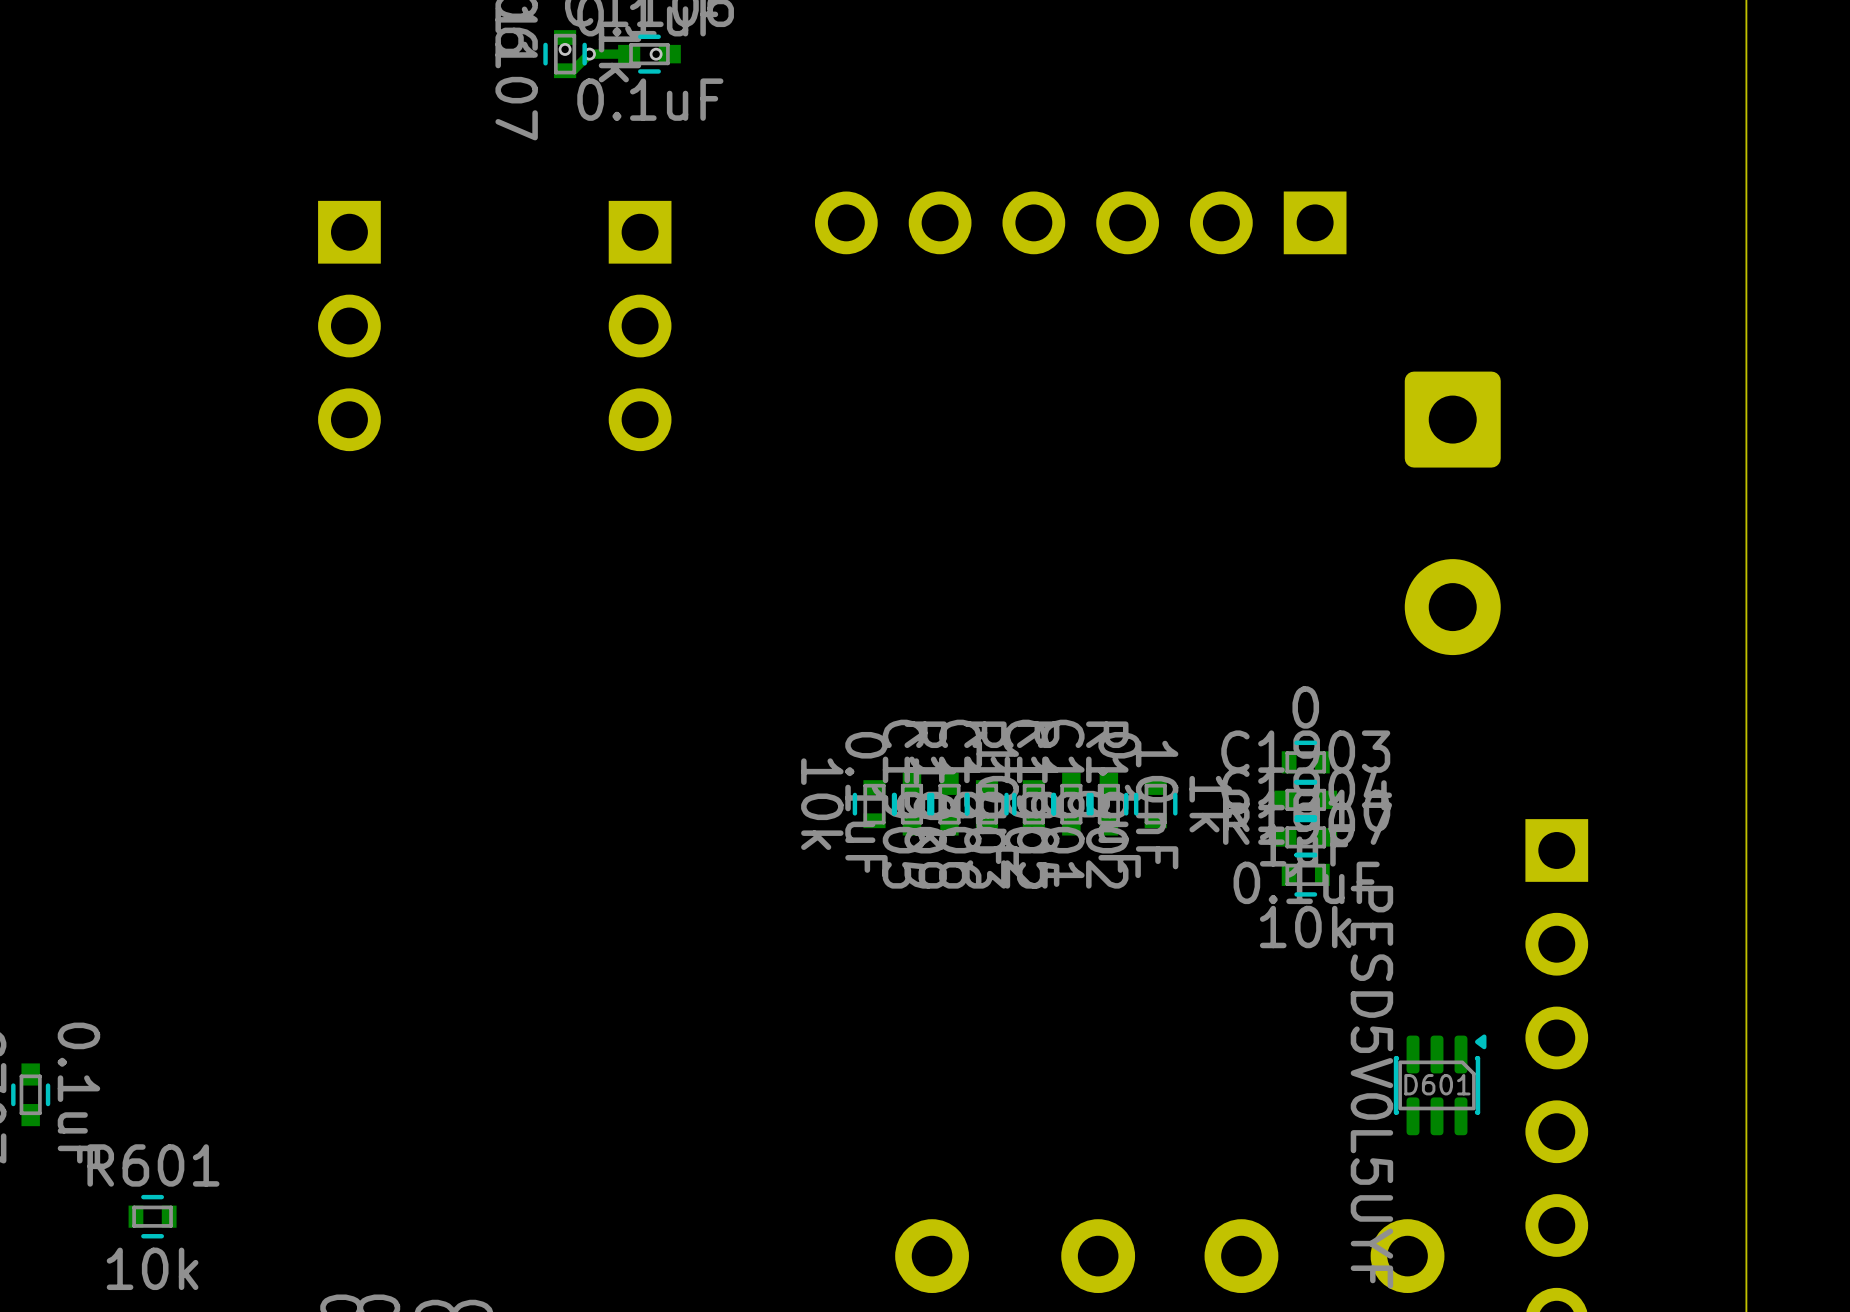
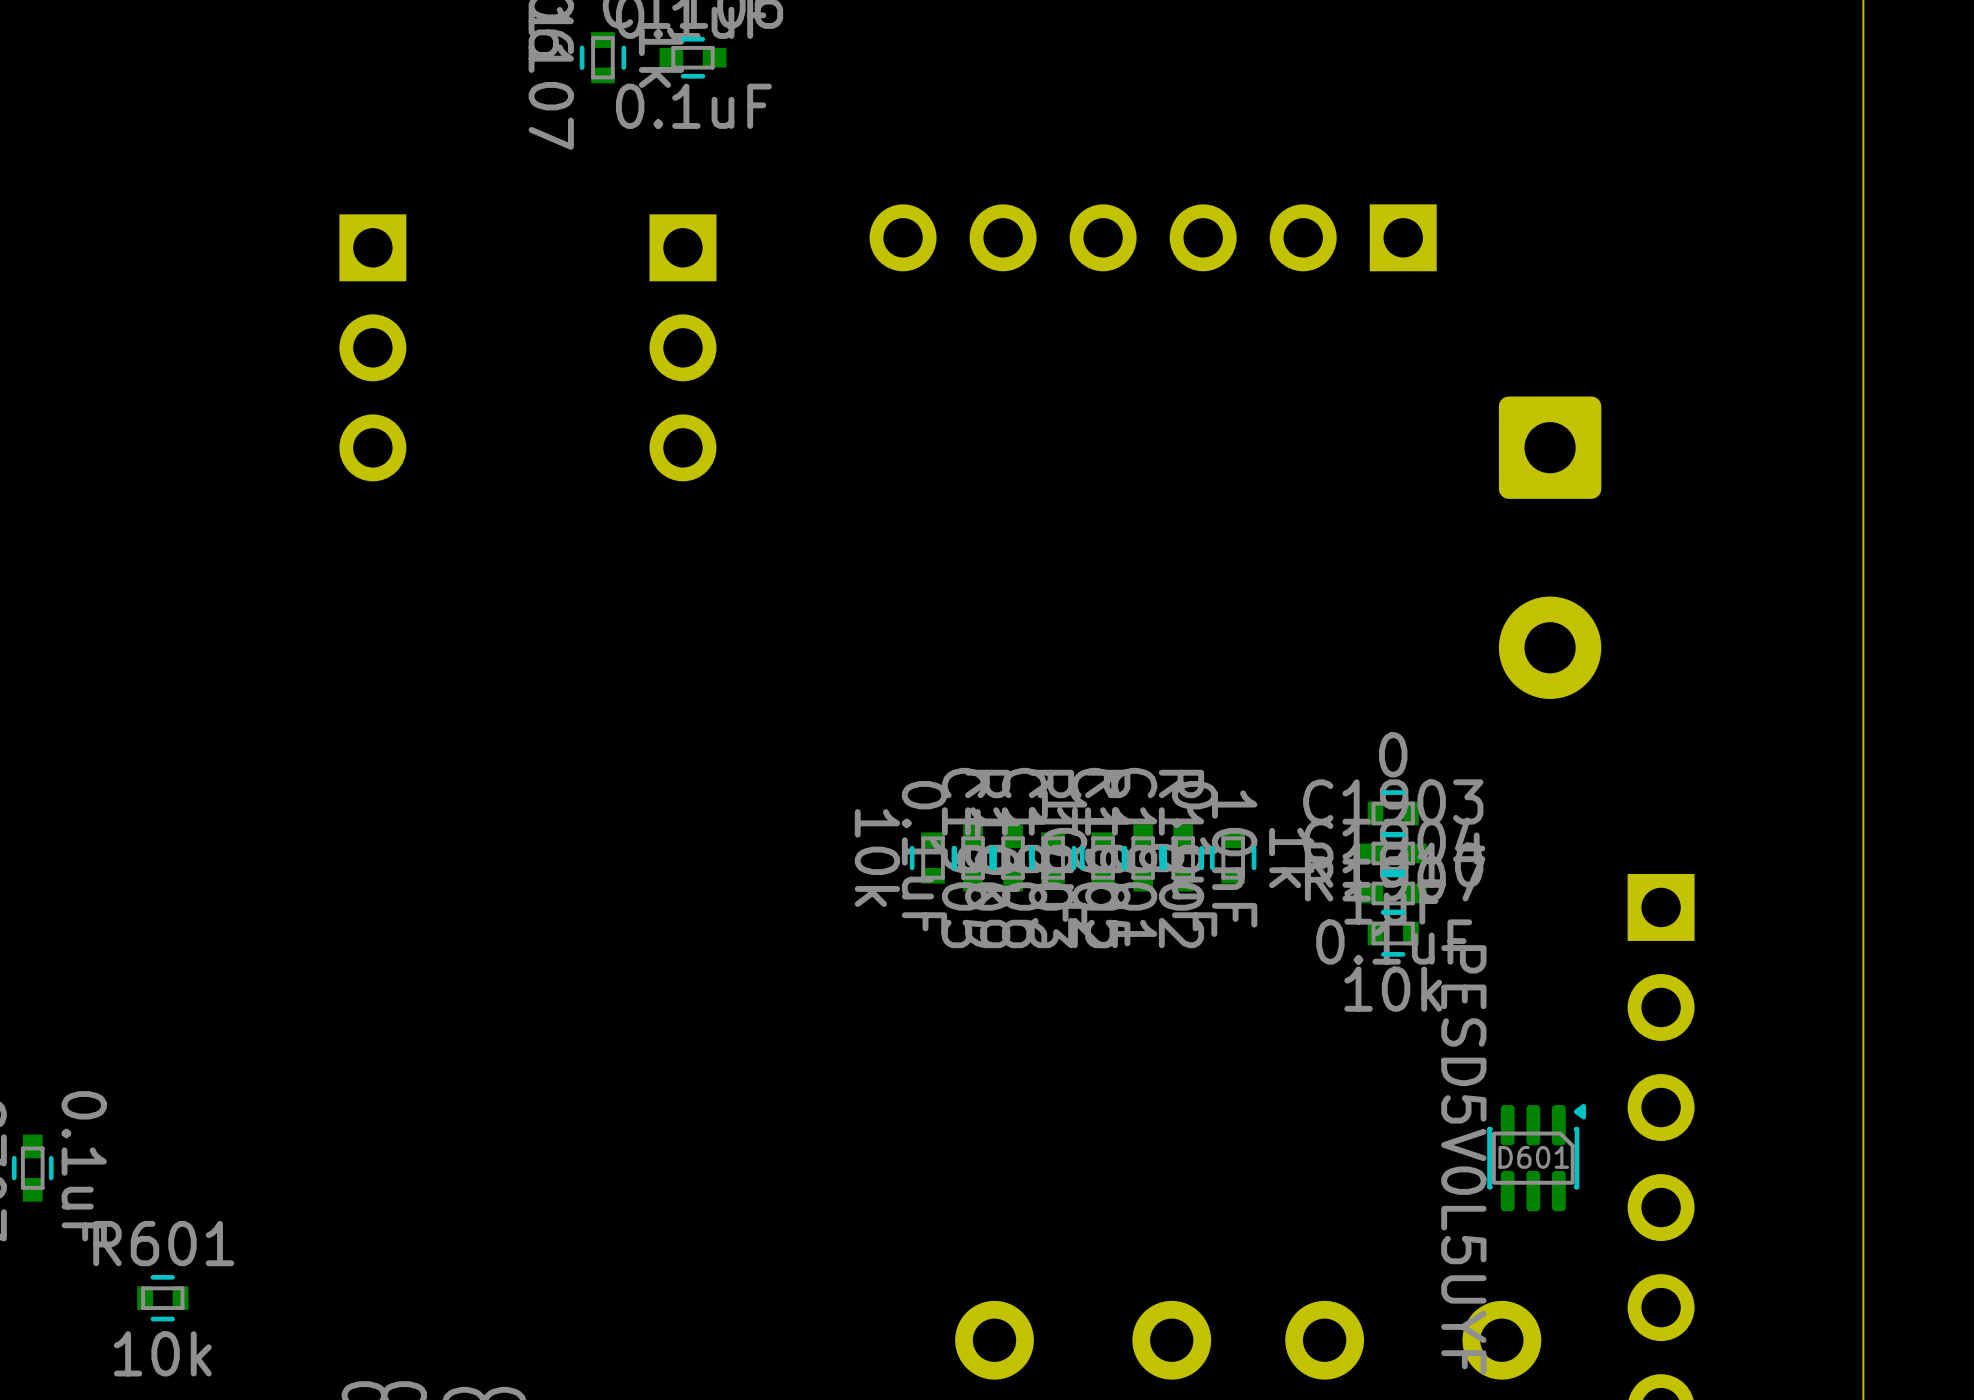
via: (565, 49) -> none
via: (589, 54) -> none
track: (629, 54) (589, 54) (572, 70) (565, 70) -> none
via: (656, 54) -> none

